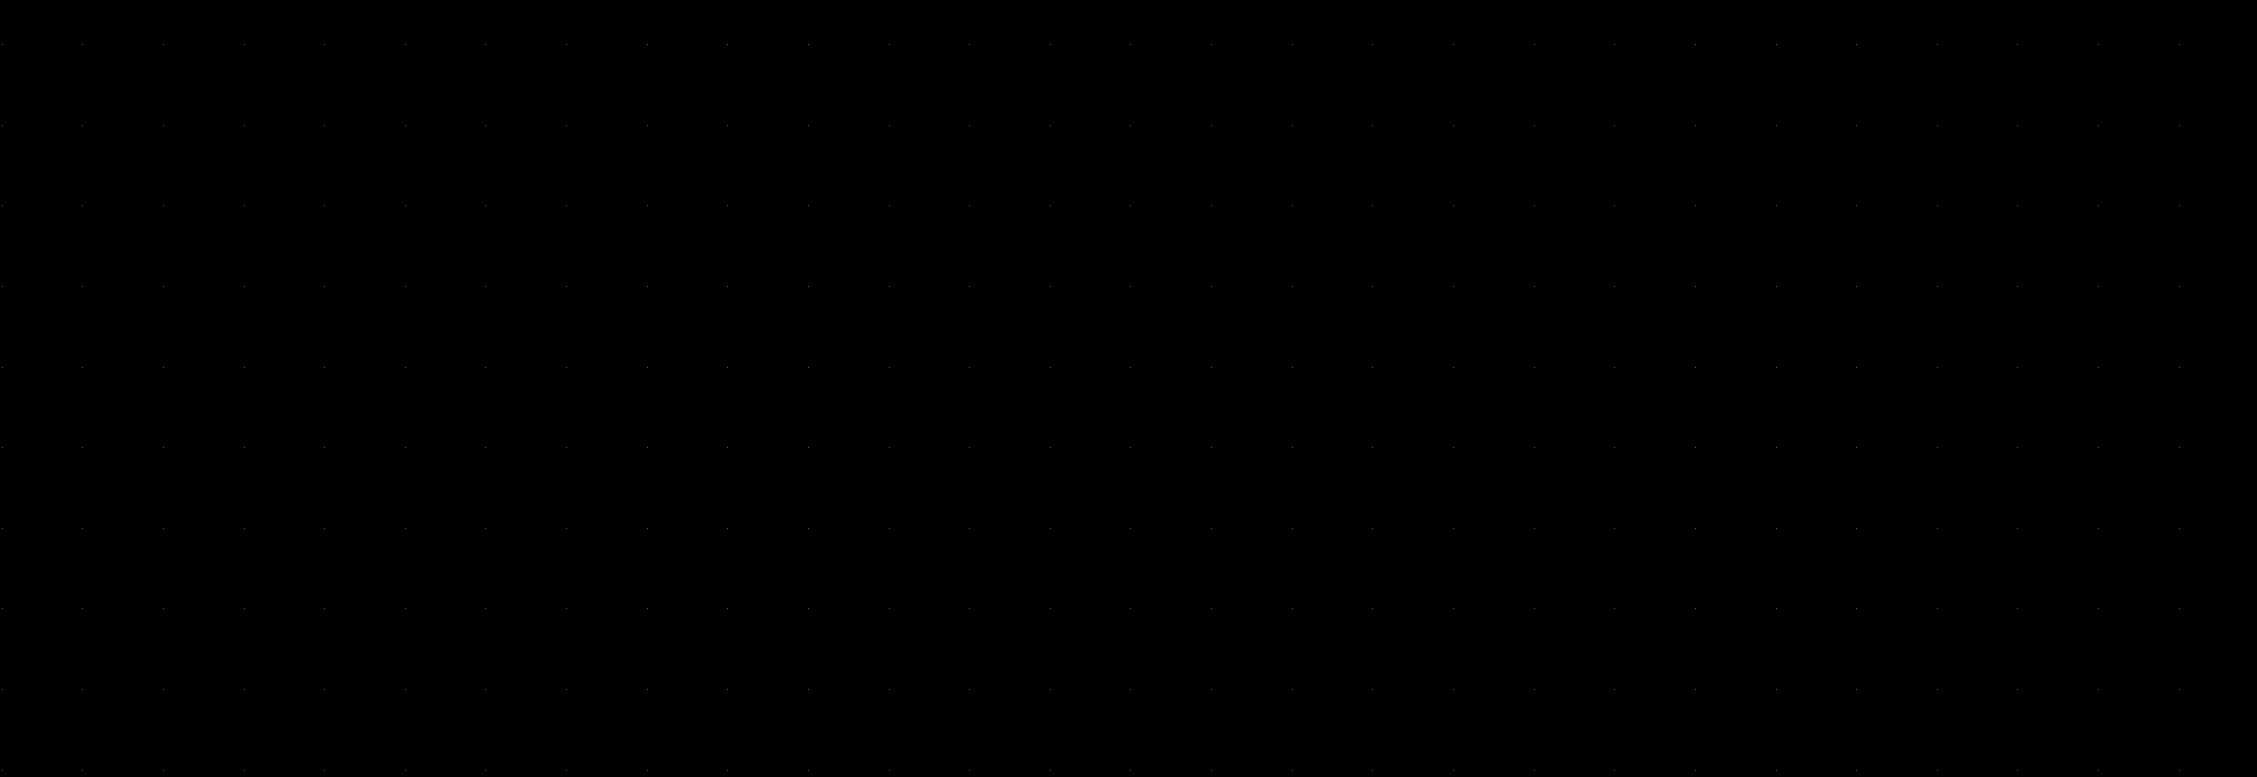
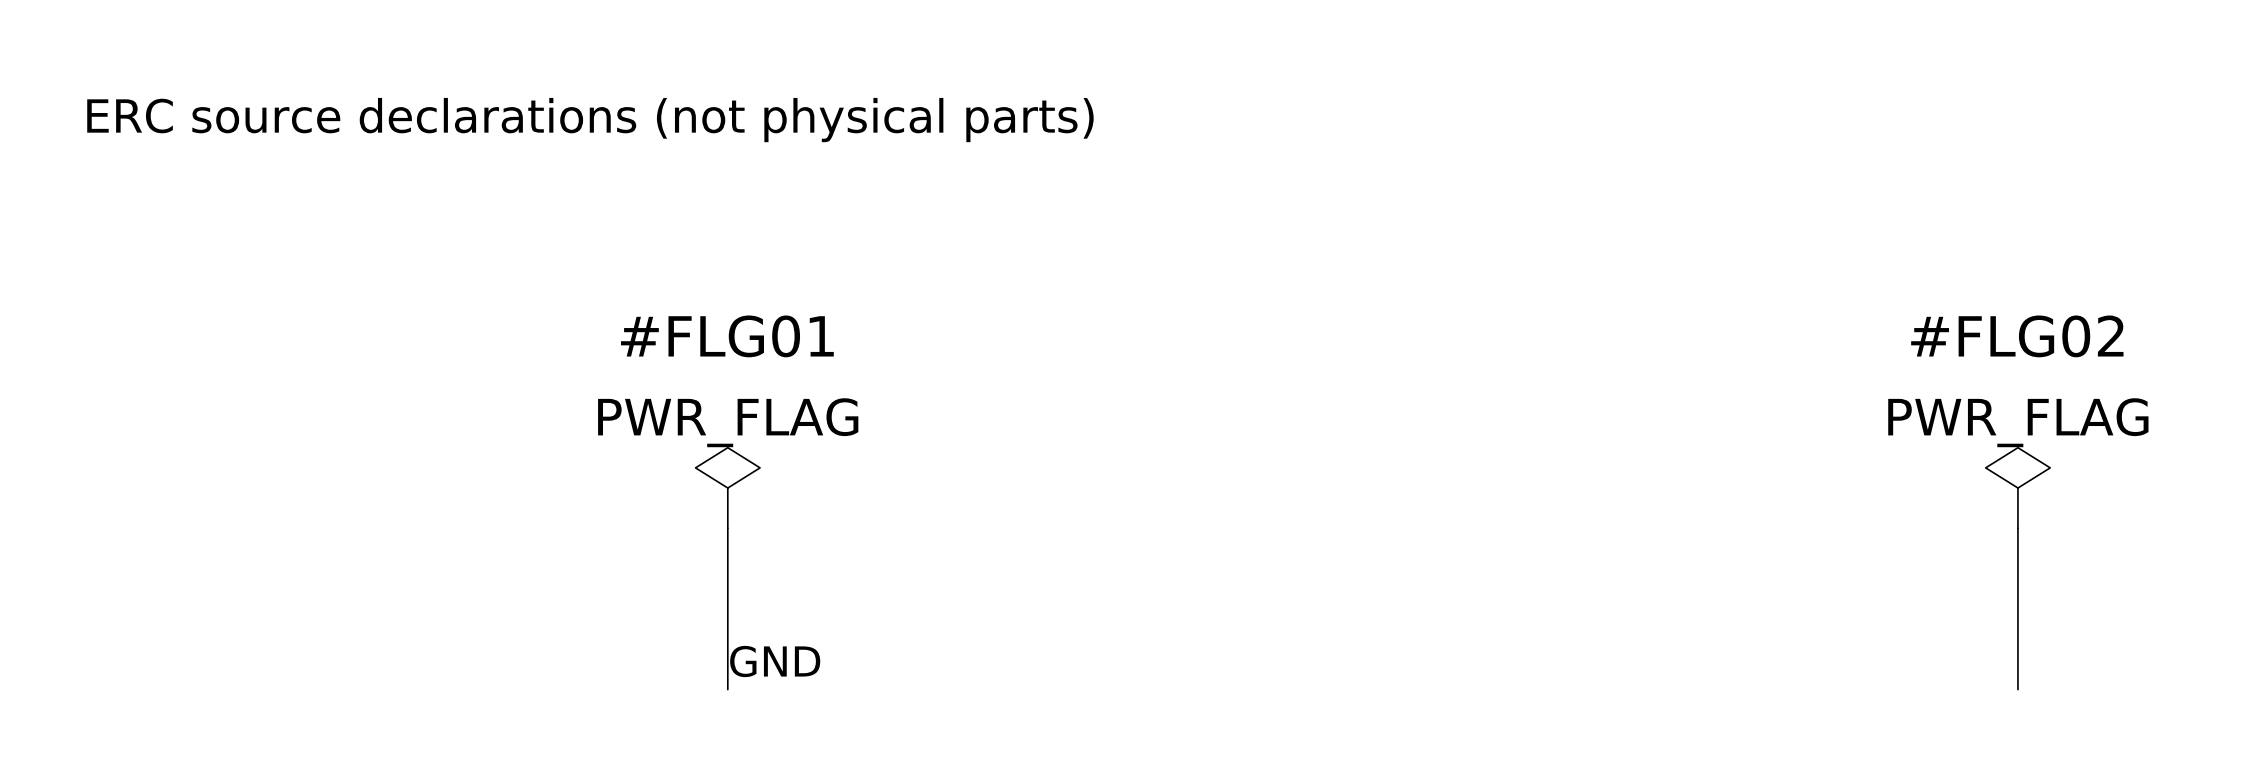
text: none -> ERC source declarations (not physical parts) (590, 120)
#FLG01: none -> PWR_FLAG (727, 488)
#FLG02: none -> PWR_FLAG (2017, 488)
wire: none -> (727, 528) (727, 689)
wire: none -> (2017, 528) (2017, 689)
label: none -> GND (775, 661)

